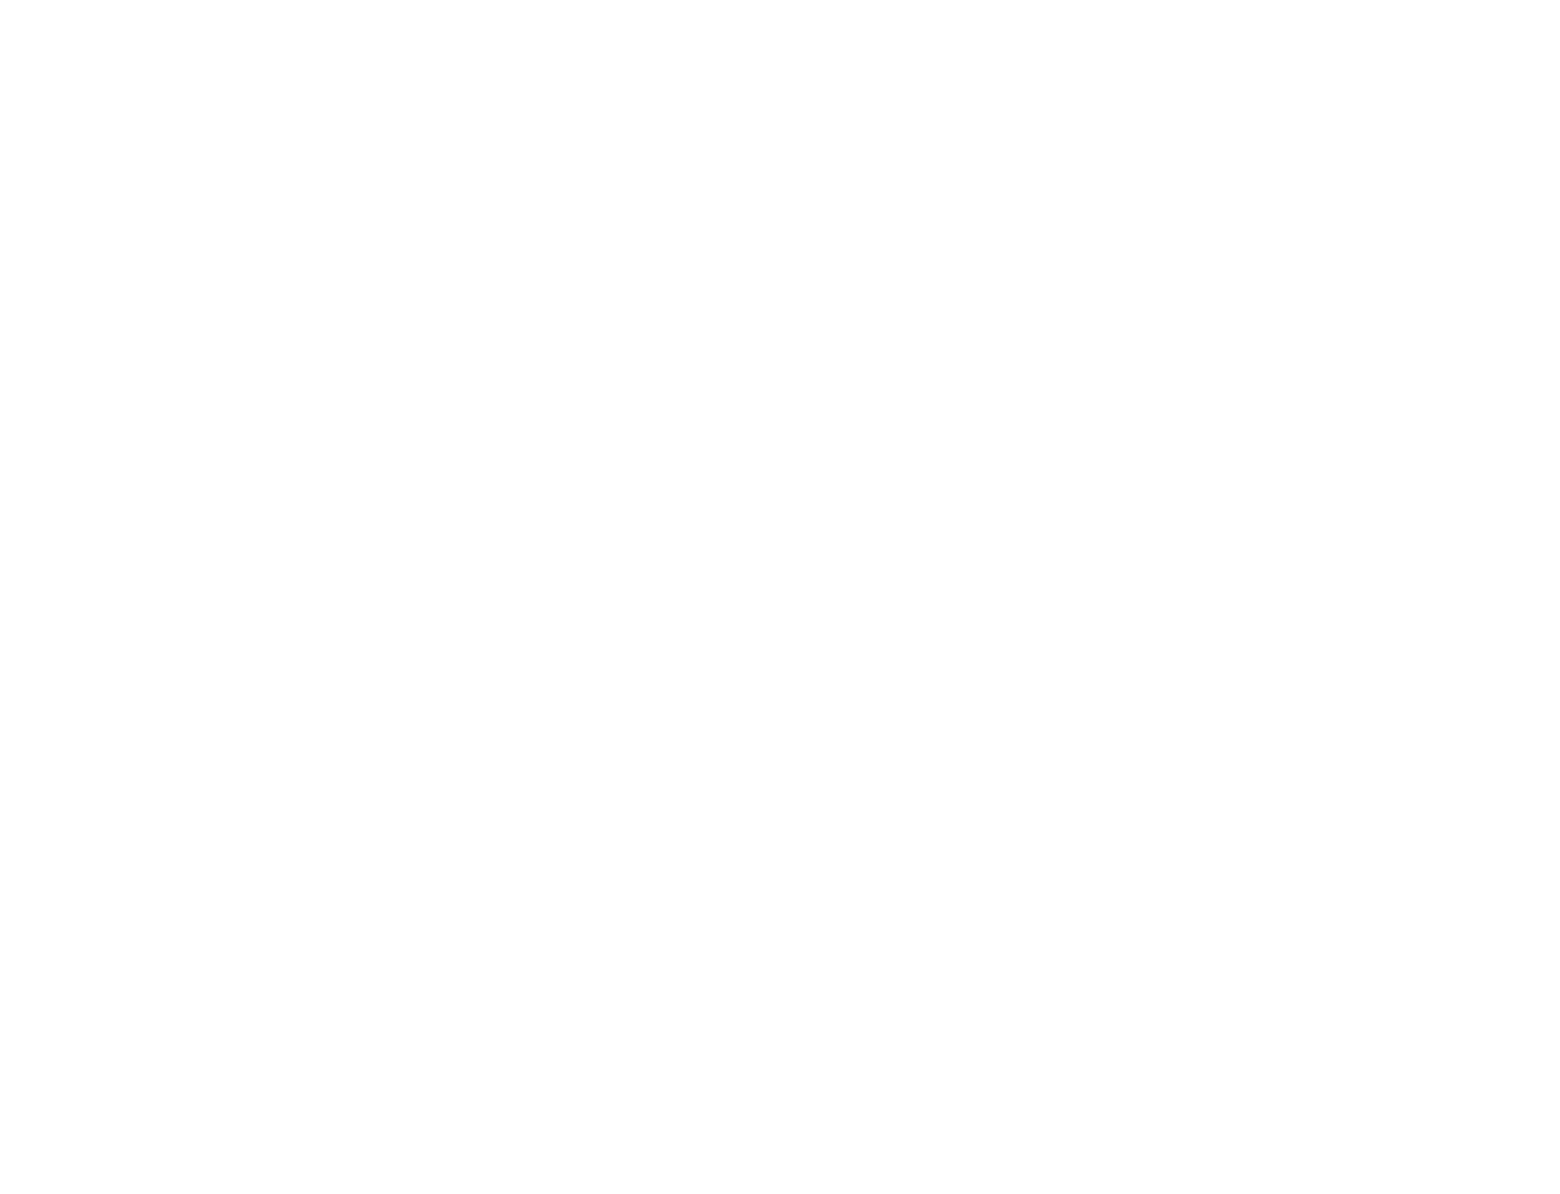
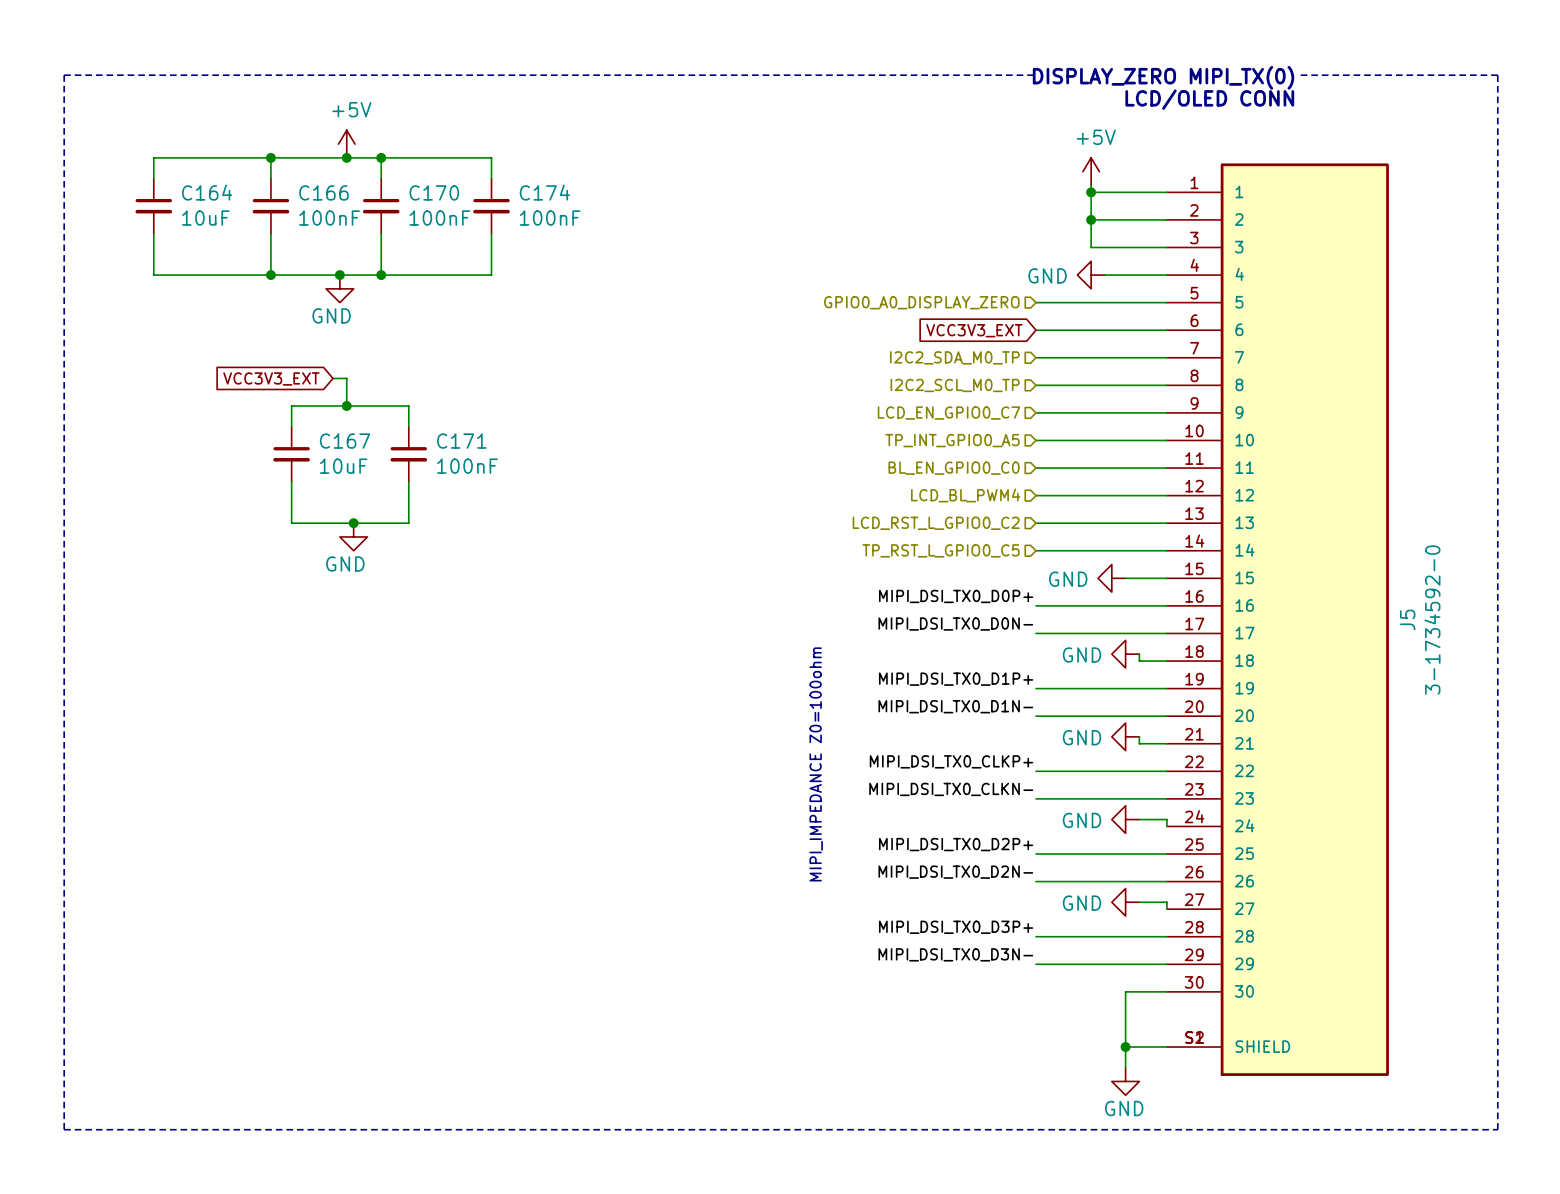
line: none -> (1036, 75) (64, 75) (64, 1129) (1497, 1129) (1497, 75) (1297, 75)
text: none -> DISPLAY_ZERO MIPI_TX(0) (1163, 77)
text: none -> LCD/OLED CONN (1209, 99)
power symbol: none -> +5V (346, 144)
wire: none -> (270, 157) (270, 178)
junction: none -> (270, 157)
junction: none -> (346, 157)
wire: none -> (381, 157) (381, 178)
junction: none -> (381, 157)
power symbol: none -> +5V (1091, 171)
wire: none -> (153, 178) (153, 157) (491, 157) (491, 178)
wire: none -> (1091, 185) (1091, 247) (1166, 247)
wire: none -> (1091, 192) (1166, 192)
junction: none -> (1091, 192)
C164: none -> 10uF (153, 206)
C166: none -> 100nF (270, 206)
C170: none -> 100nF (381, 206)
C174: none -> 100nF (491, 206)
wire: none -> (1091, 219) (1166, 219)
junction: none -> (1091, 219)
wire: none -> (153, 233) (153, 275) (491, 275) (491, 233)
wire: none -> (270, 233) (270, 275)
wire: none -> (381, 233) (381, 275)
junction: none -> (270, 275)
junction: none -> (339, 275)
junction: none -> (381, 275)
power symbol: none -> GND (1091, 275)
wire: none -> (1104, 275) (1166, 275)
power symbol: none -> GND (339, 288)
wire: none -> (1036, 302) (1166, 302)
hierarchical label: none -> GPIO0_A0_DISPLAY_ZERO (921, 302)
wire: none -> (1036, 330) (1166, 330)
global label: none -> VCC3V3_EXT (974, 330)
wire: none -> (1036, 357) (1166, 357)
hierarchical label: none -> I2C2_SDA_M0_TP (954, 357)
wire: none -> (332, 378) (346, 378) (346, 406)
global label: none -> VCC3V3_EXT (271, 378)
wire: none -> (1036, 385) (1166, 385)
hierarchical label: none -> I2C2_SCL_M0_TP (955, 385)
junction: none -> (346, 406)
wire: none -> (1036, 412) (1166, 412)
hierarchical label: none -> LCD_EN_GPIO0_C7 (948, 413)
wire: none -> (291, 426) (291, 406) (408, 406) (408, 426)
wire: none -> (1036, 440) (1166, 440)
hierarchical label: none -> TP_INT_GPIO0_A5 (952, 440)
C167: none -> 10uF (291, 454)
C171: none -> 100nF (408, 454)
hierarchical label: none -> BL_EN_GPIO0_C0 (954, 468)
wire: none -> (1036, 468) (1166, 468)
wire: none -> (291, 481) (291, 523) (408, 523) (408, 481)
wire: none -> (1036, 495) (1166, 495)
hierarchical label: none -> LCD_BL_PWM4 (965, 495)
junction: none -> (353, 523)
hierarchical label: none -> LCD_RST_L_GPIO0_C2 (936, 523)
wire: none -> (1036, 523) (1166, 523)
power symbol: none -> GND (353, 536)
wire: none -> (1036, 550) (1166, 550)
hierarchical label: none -> TP_RST_L_GPIO0_C5 (941, 550)
power symbol: none -> GND (1111, 578)
wire: none -> (1125, 578) (1166, 578)
label: none -> MIPI_DSI_TX0_D0P+ (956, 596)
wire: none -> (1036, 605) (1166, 605)
J5: none -> 3-1734592-0 (1277, 619)
label: none -> MIPI_DSI_TX0_D0N- (955, 624)
wire: none -> (1036, 633) (1166, 633)
power symbol: none -> GND (1125, 654)
wire: none -> (1139, 654) (1139, 661) (1166, 661)
label: none -> MIPI_DSI_TX0_D1P+ (956, 679)
wire: none -> (1036, 688) (1166, 688)
label: none -> MIPI_DSI_TX0_D1N- (955, 706)
wire: none -> (1036, 716) (1166, 716)
power symbol: none -> GND (1125, 736)
wire: none -> (1139, 736) (1139, 743) (1166, 743)
text: none -> MIPI_IMPEDANCE Z0=100ohm (816, 764)
label: none -> MIPI_DSI_TX0_CLKP+ (951, 761)
wire: none -> (1036, 771) (1166, 771)
label: none -> MIPI_DSI_TX0_CLKN- (951, 789)
wire: none -> (1036, 798) (1166, 798)
power symbol: none -> GND (1125, 819)
wire: none -> (1139, 819) (1166, 819) (1166, 826)
label: none -> MIPI_DSI_TX0_D2P+ (956, 844)
wire: none -> (1036, 854) (1166, 854)
label: none -> MIPI_DSI_TX0_D2N- (955, 872)
wire: none -> (1036, 881) (1166, 881)
power symbol: none -> GND (1125, 902)
wire: none -> (1139, 902) (1166, 902) (1166, 909)
label: none -> MIPI_DSI_TX0_D3P+ (956, 927)
wire: none -> (1036, 936) (1166, 936)
label: none -> MIPI_DSI_TX0_D3N- (955, 954)
wire: none -> (1036, 964) (1166, 964)
wire: none -> (1166, 991) (1125, 991) (1125, 1067)
wire: none -> (1125, 1047) (1166, 1047)
junction: none -> (1125, 1047)
power symbol: none -> GND (1125, 1081)

